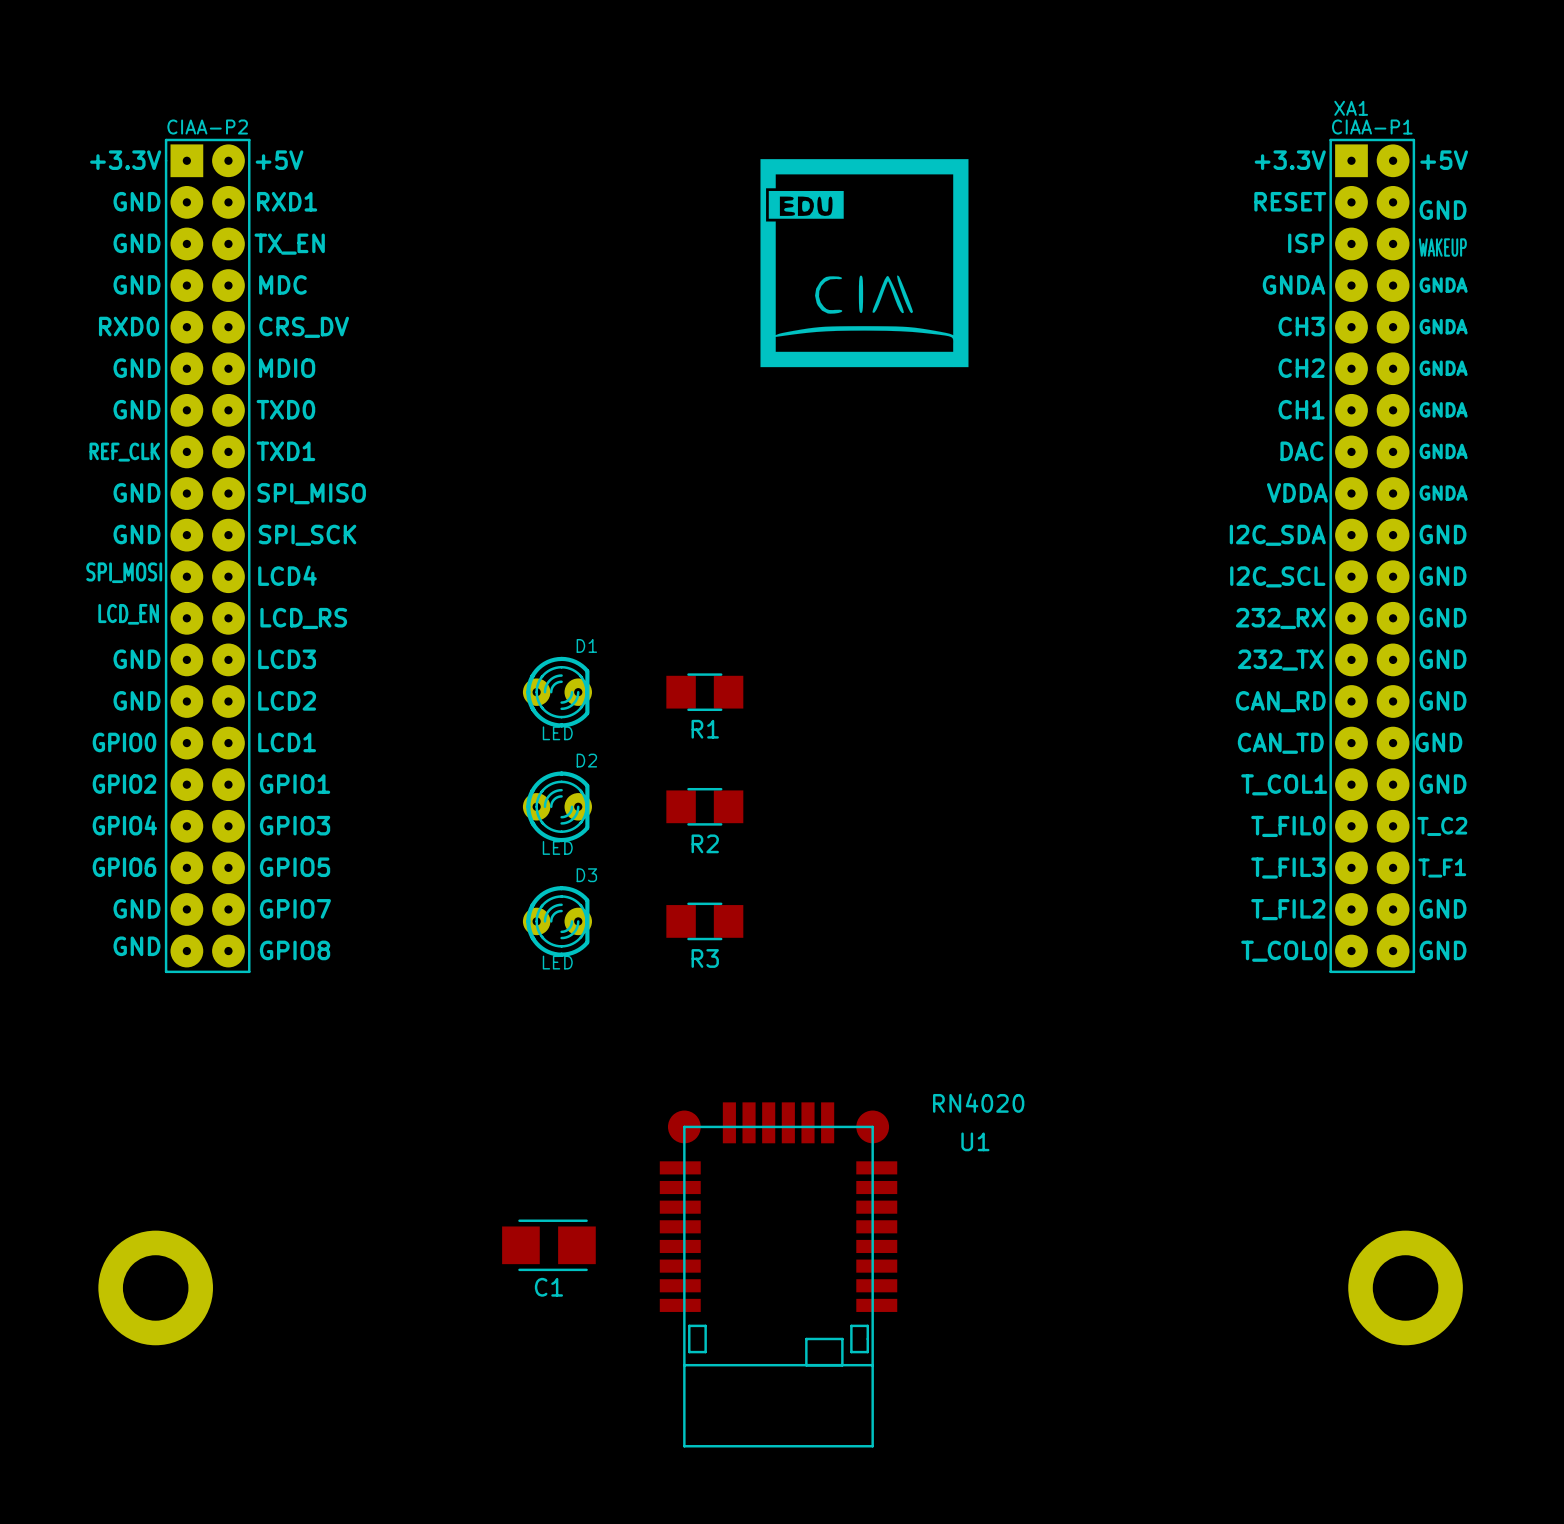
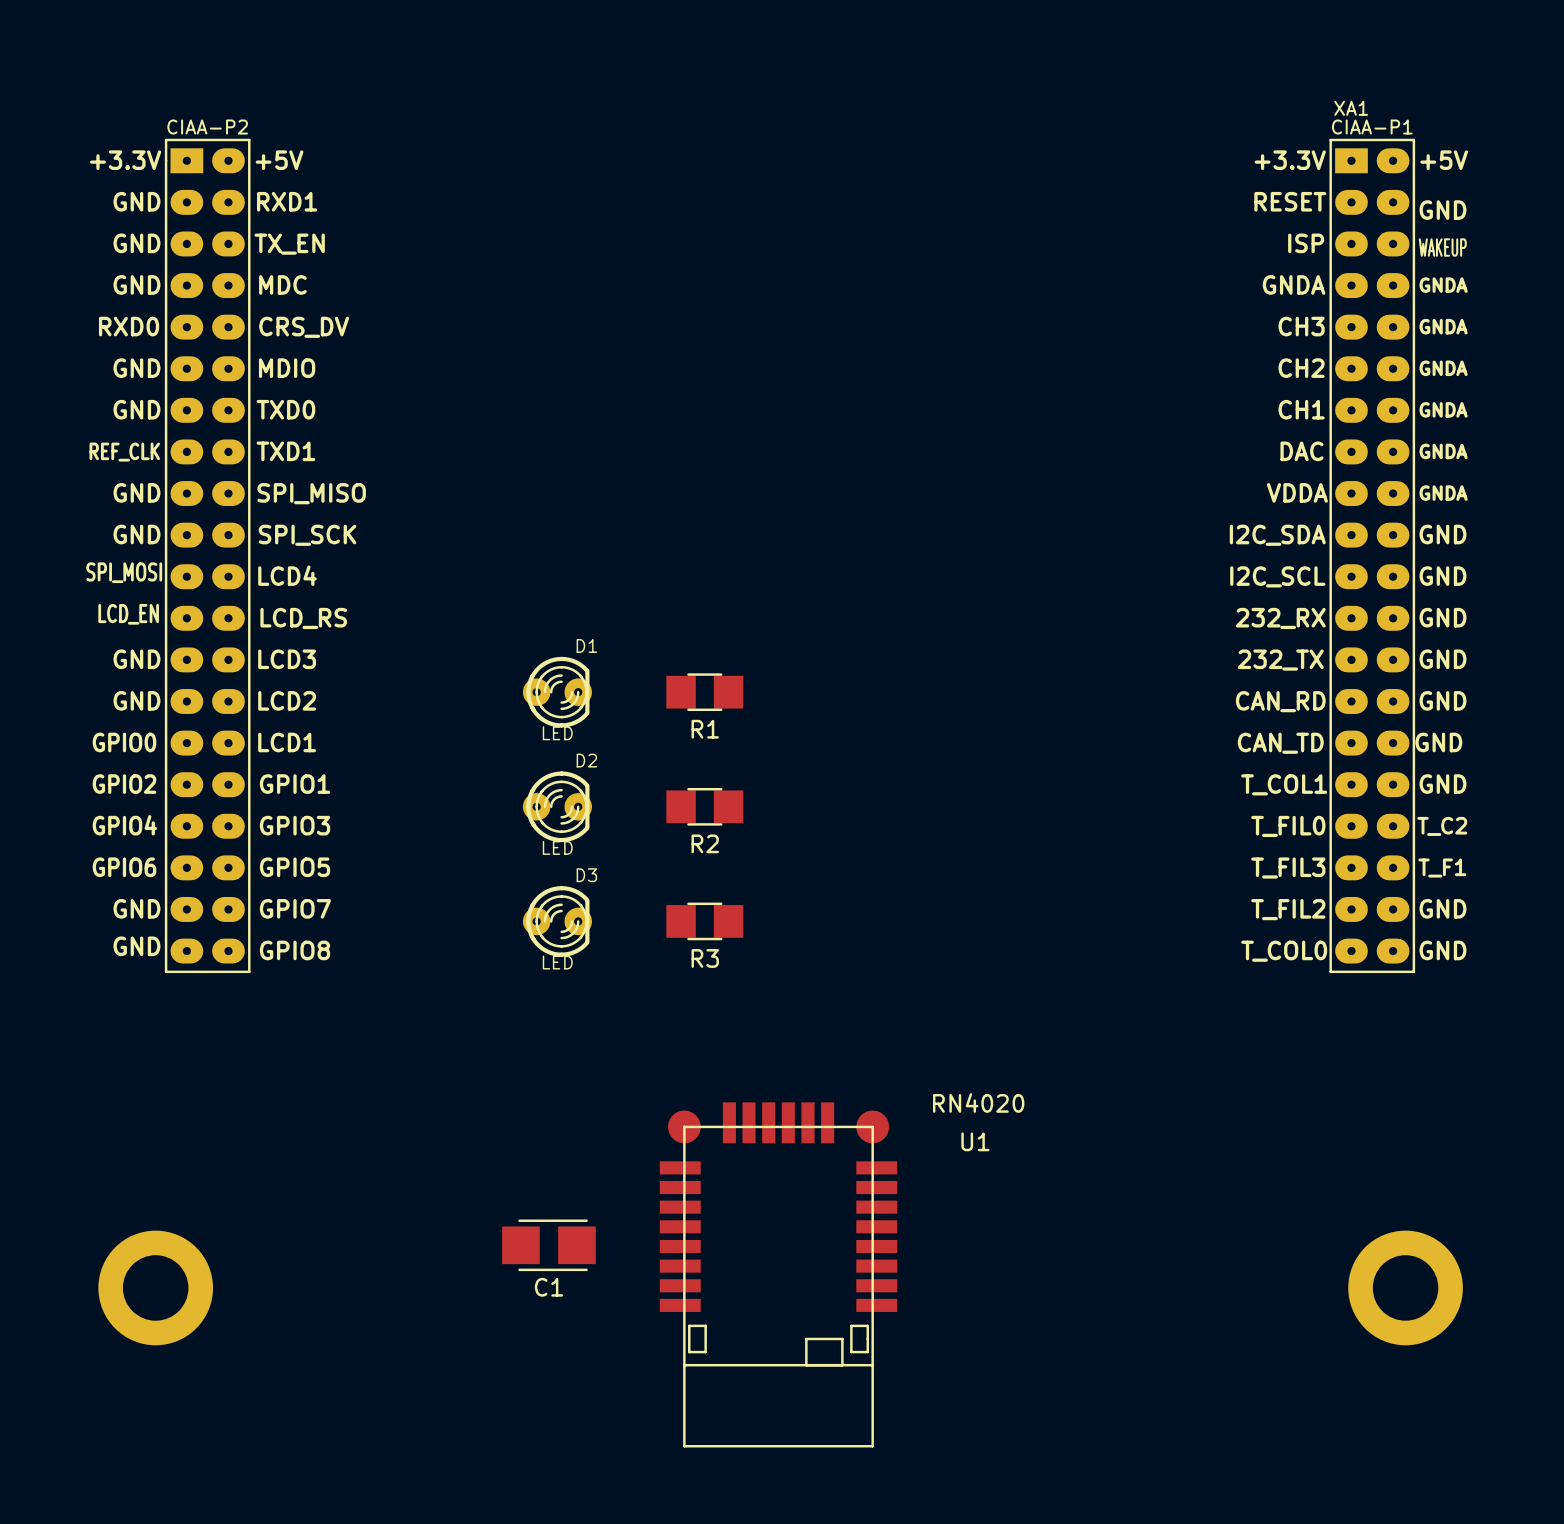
XA1 footprint: [98, 138, 1463, 1346] -> [98, 138, 1463, 1346]
drawing: [760, 159, 969, 368] -> none

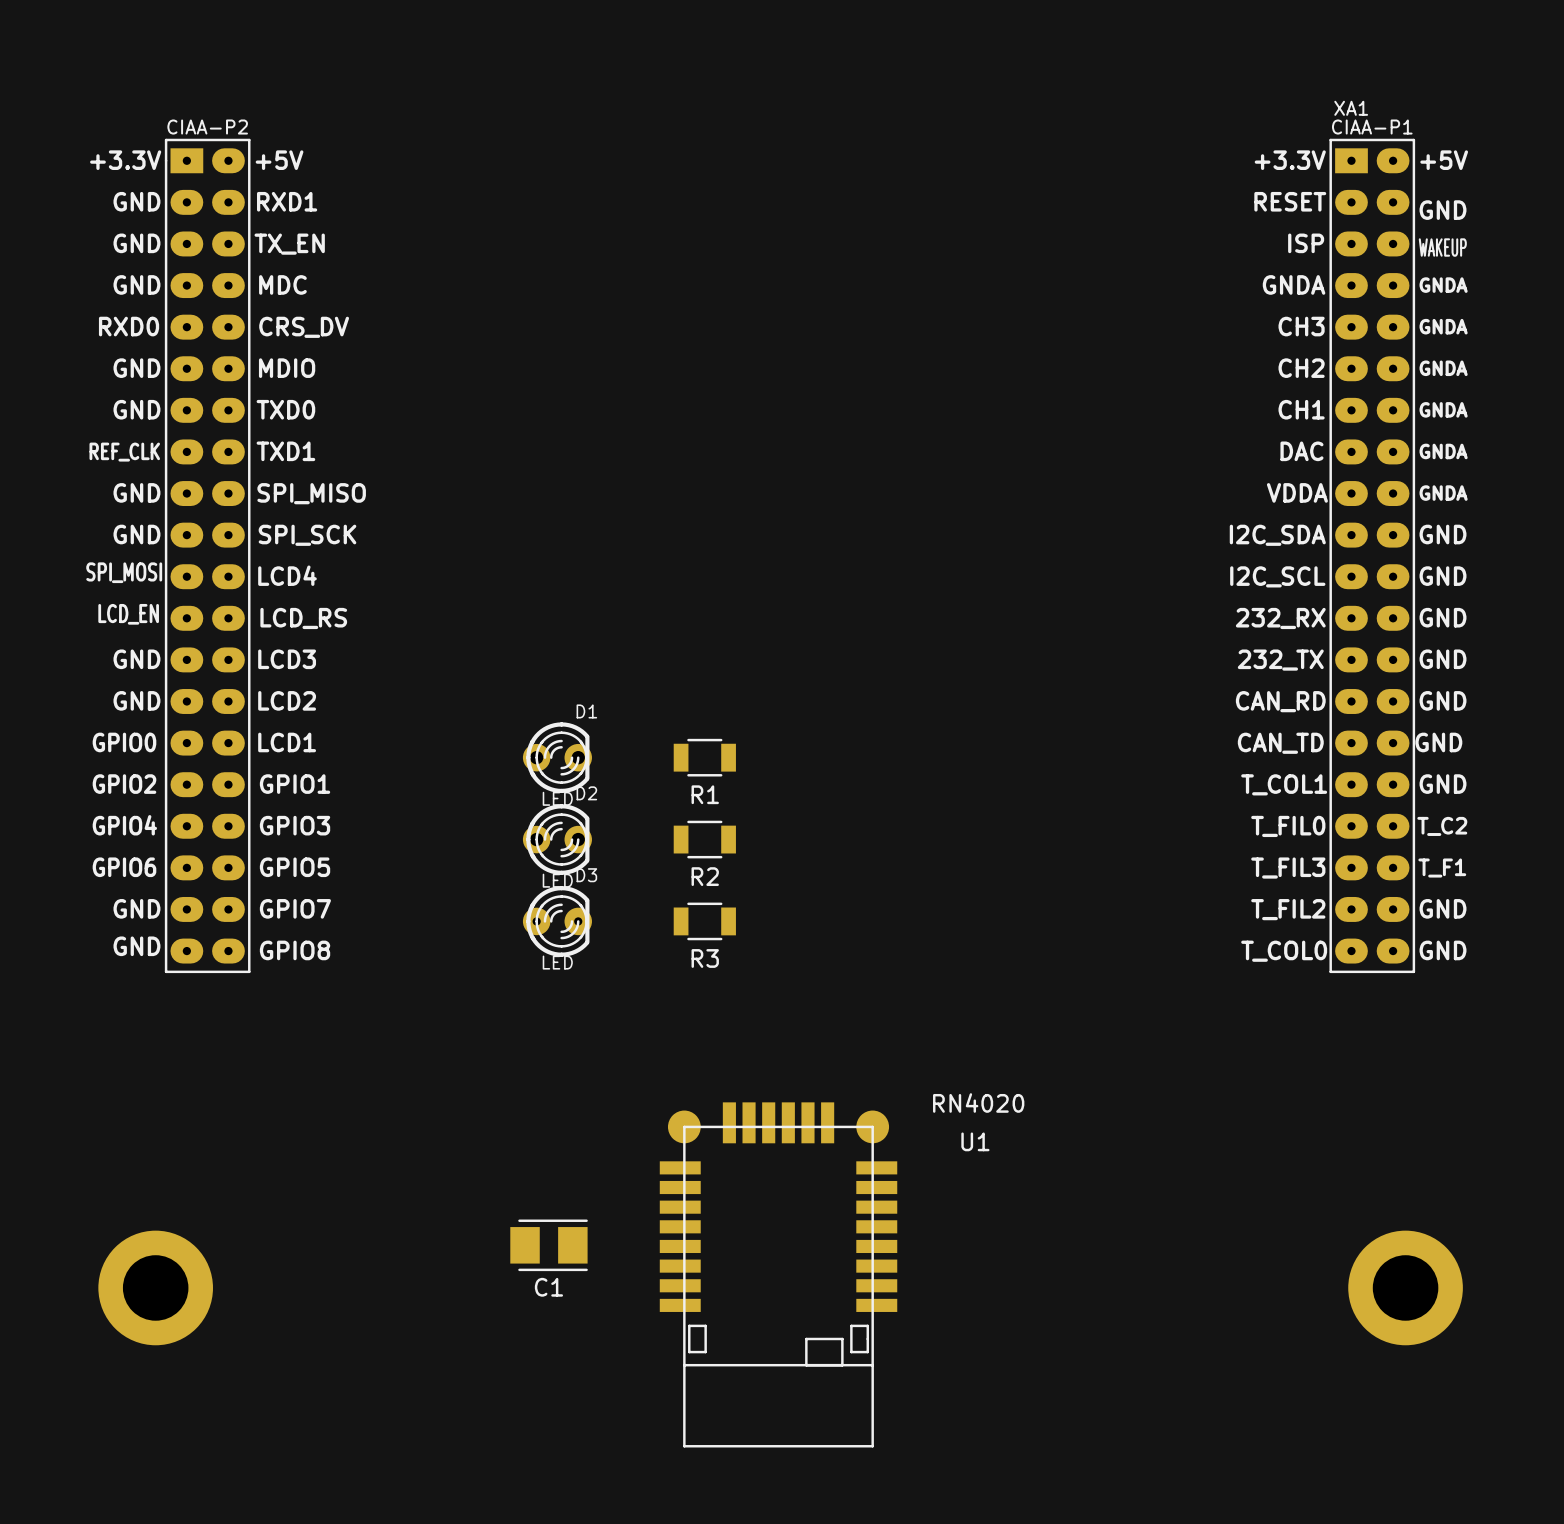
D1 footprint: [522, 656, 592, 728] -> [522, 722, 592, 794]
R1 footprint: [666, 673, 744, 712] -> [673, 738, 736, 777]
D2 footprint: [522, 771, 592, 843] -> [522, 804, 592, 875]
R2 footprint: [666, 787, 744, 826] -> [673, 820, 736, 859]
R3 footprint: [666, 902, 744, 941] -> [673, 902, 736, 941]
C1 footprint: [502, 1219, 596, 1272] -> [510, 1219, 588, 1272]

